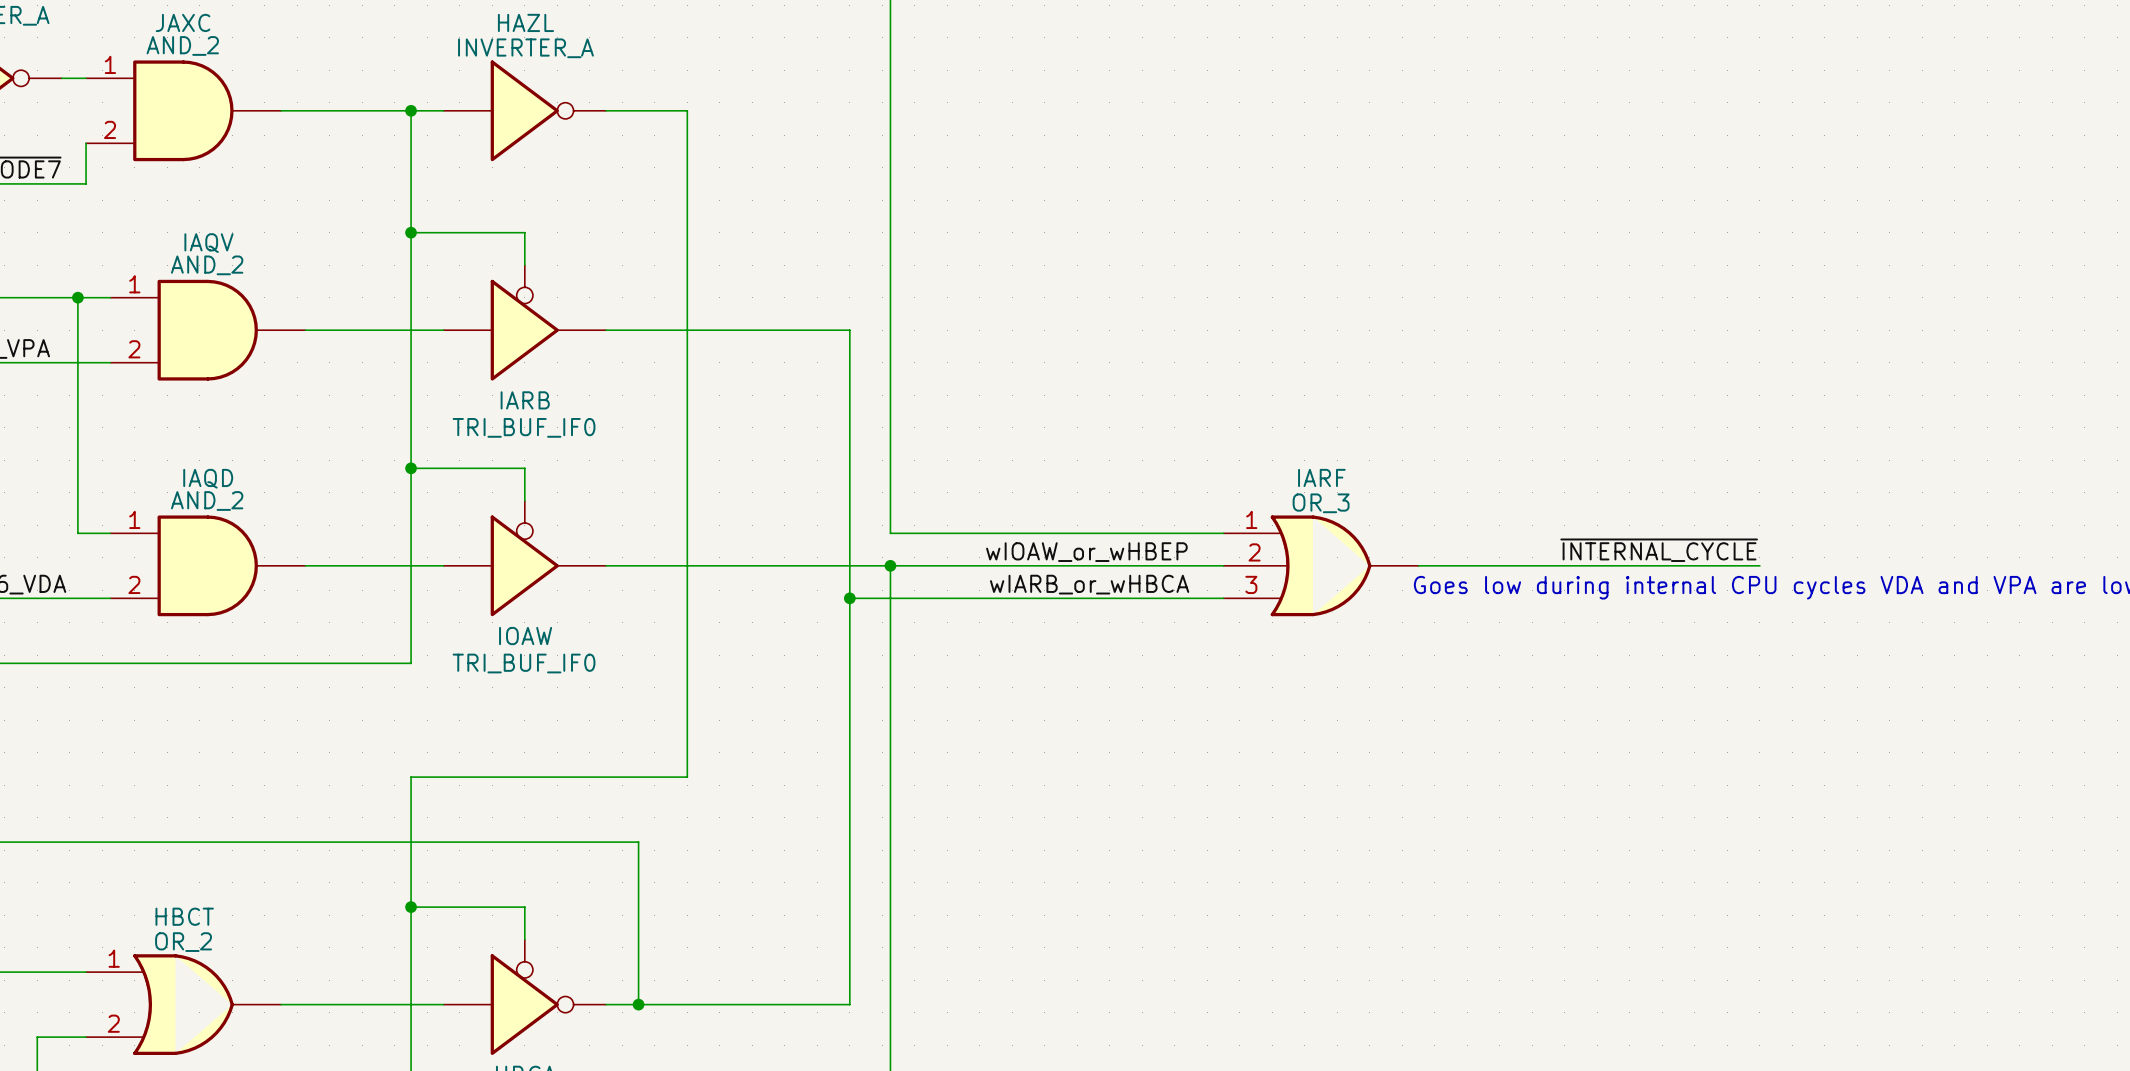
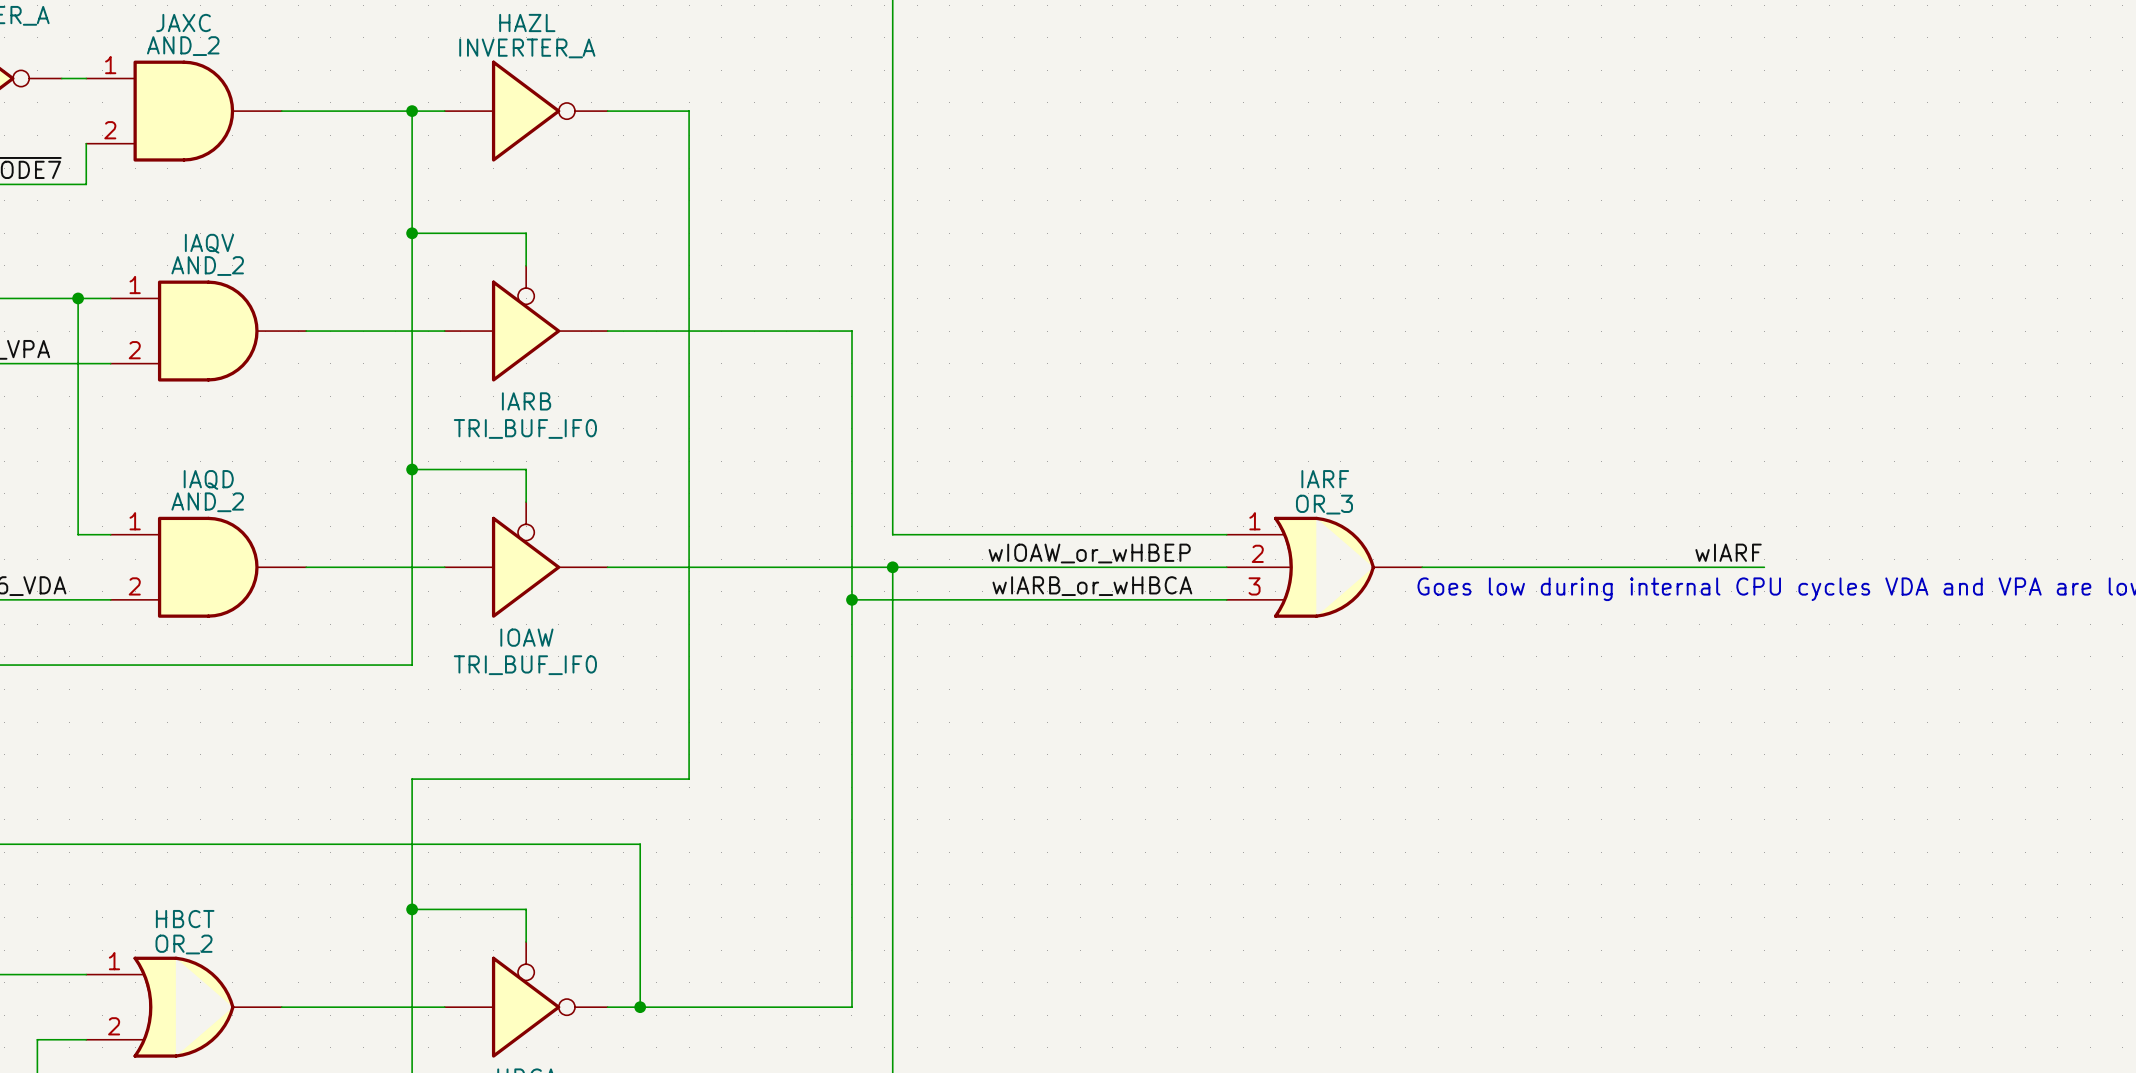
label: ~{INTERNAL_CYCLE} (1659, 550) -> wIARF (1728, 552)

